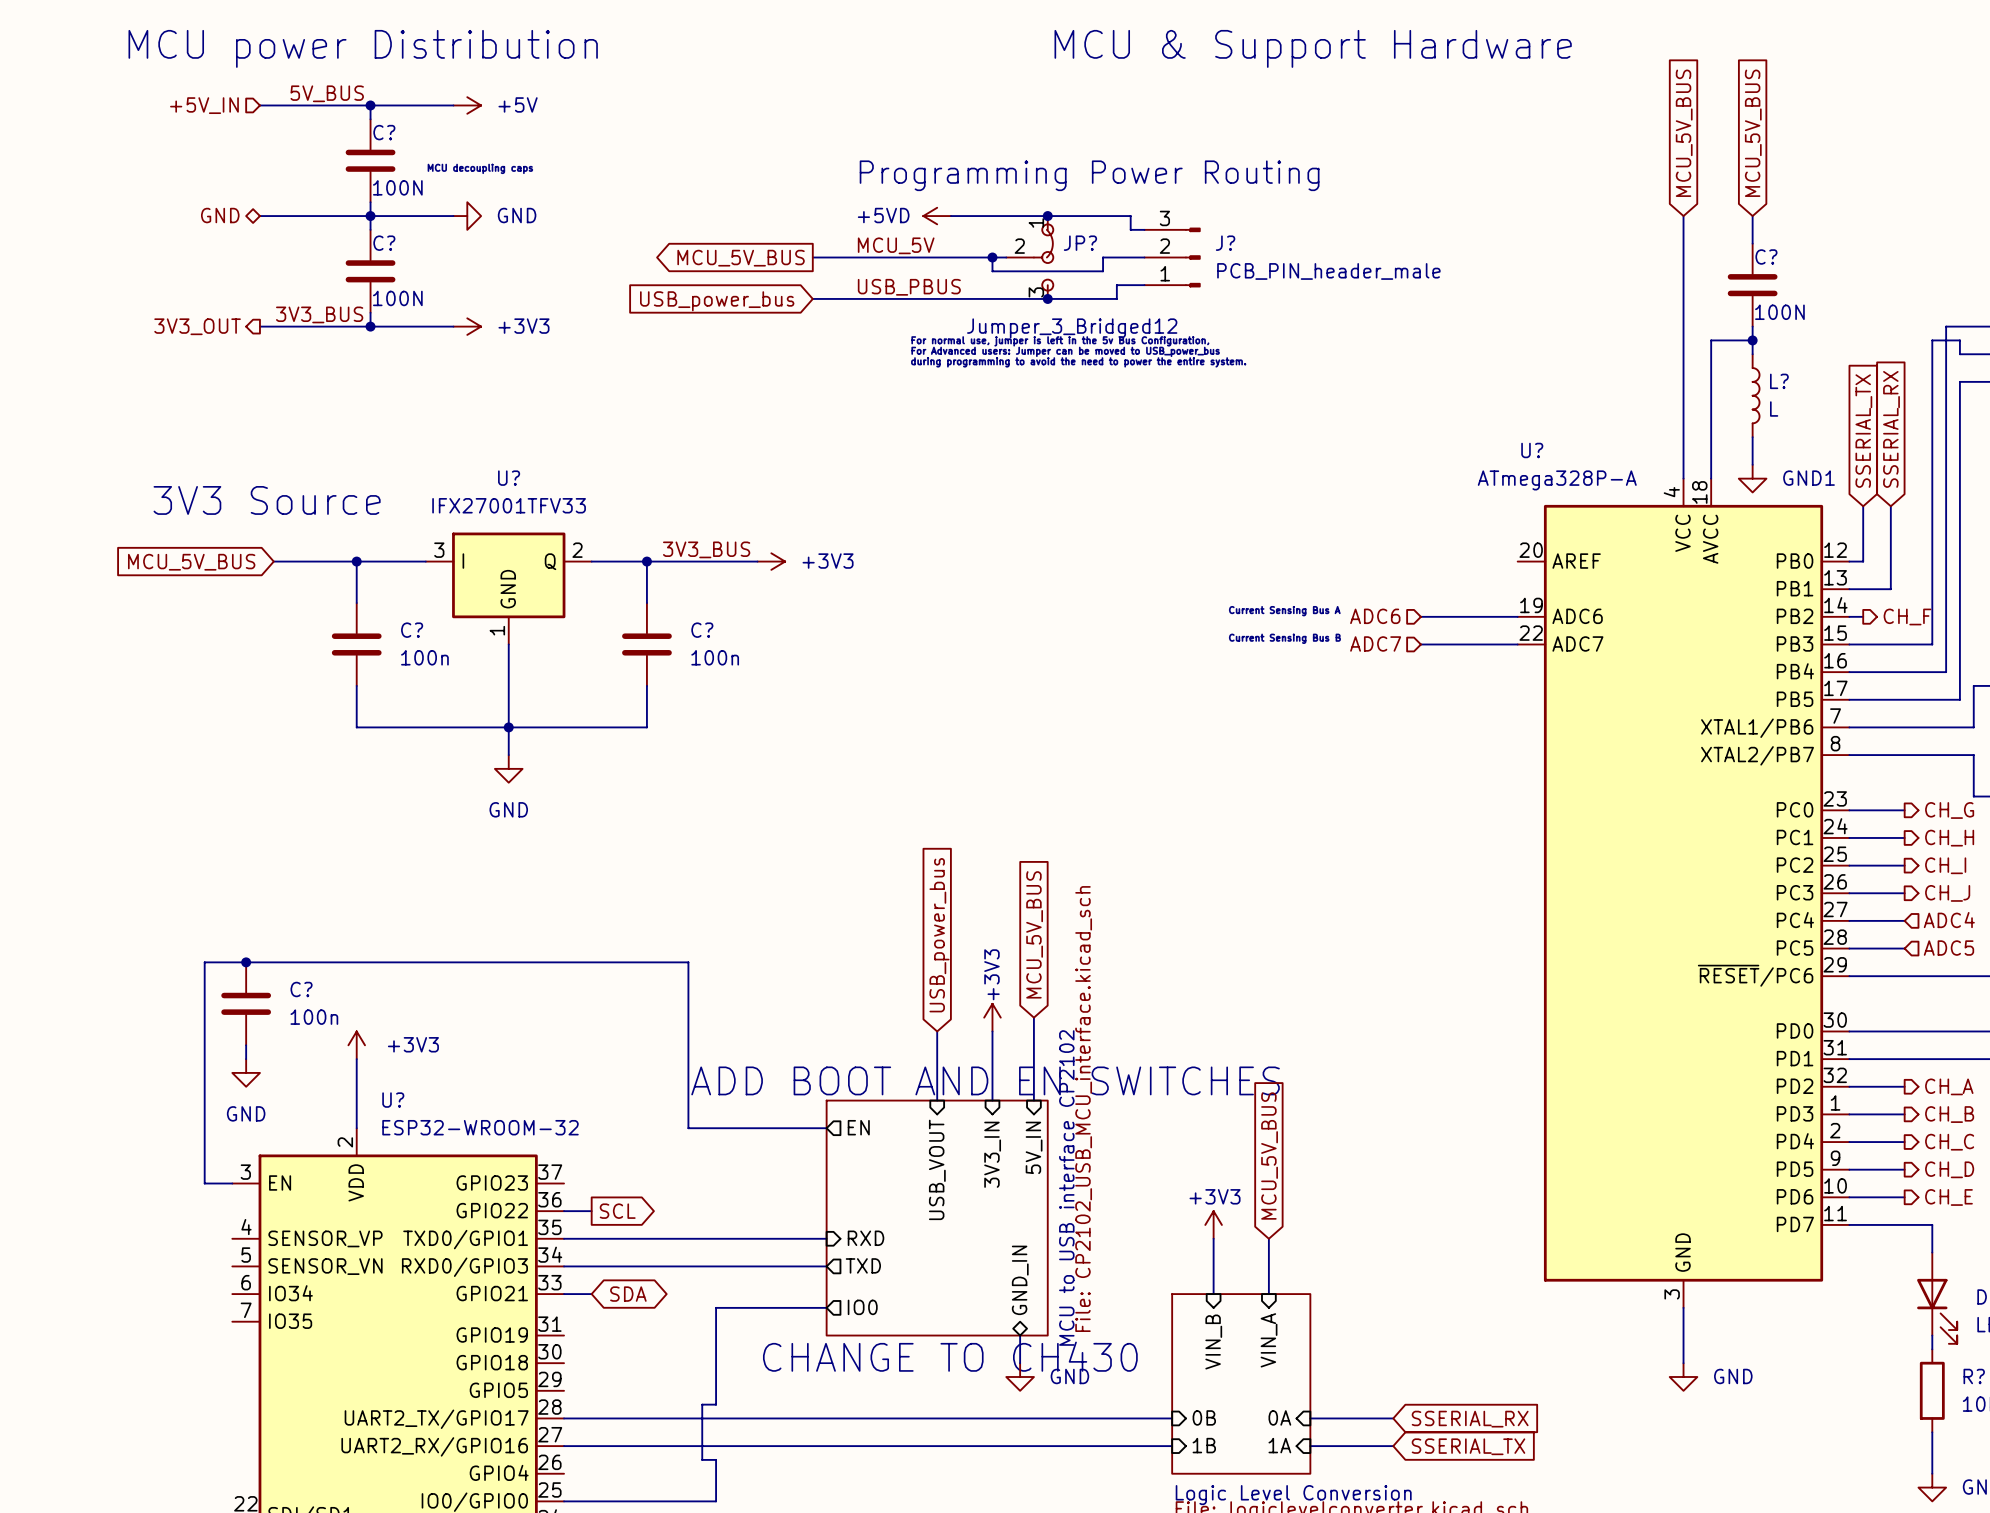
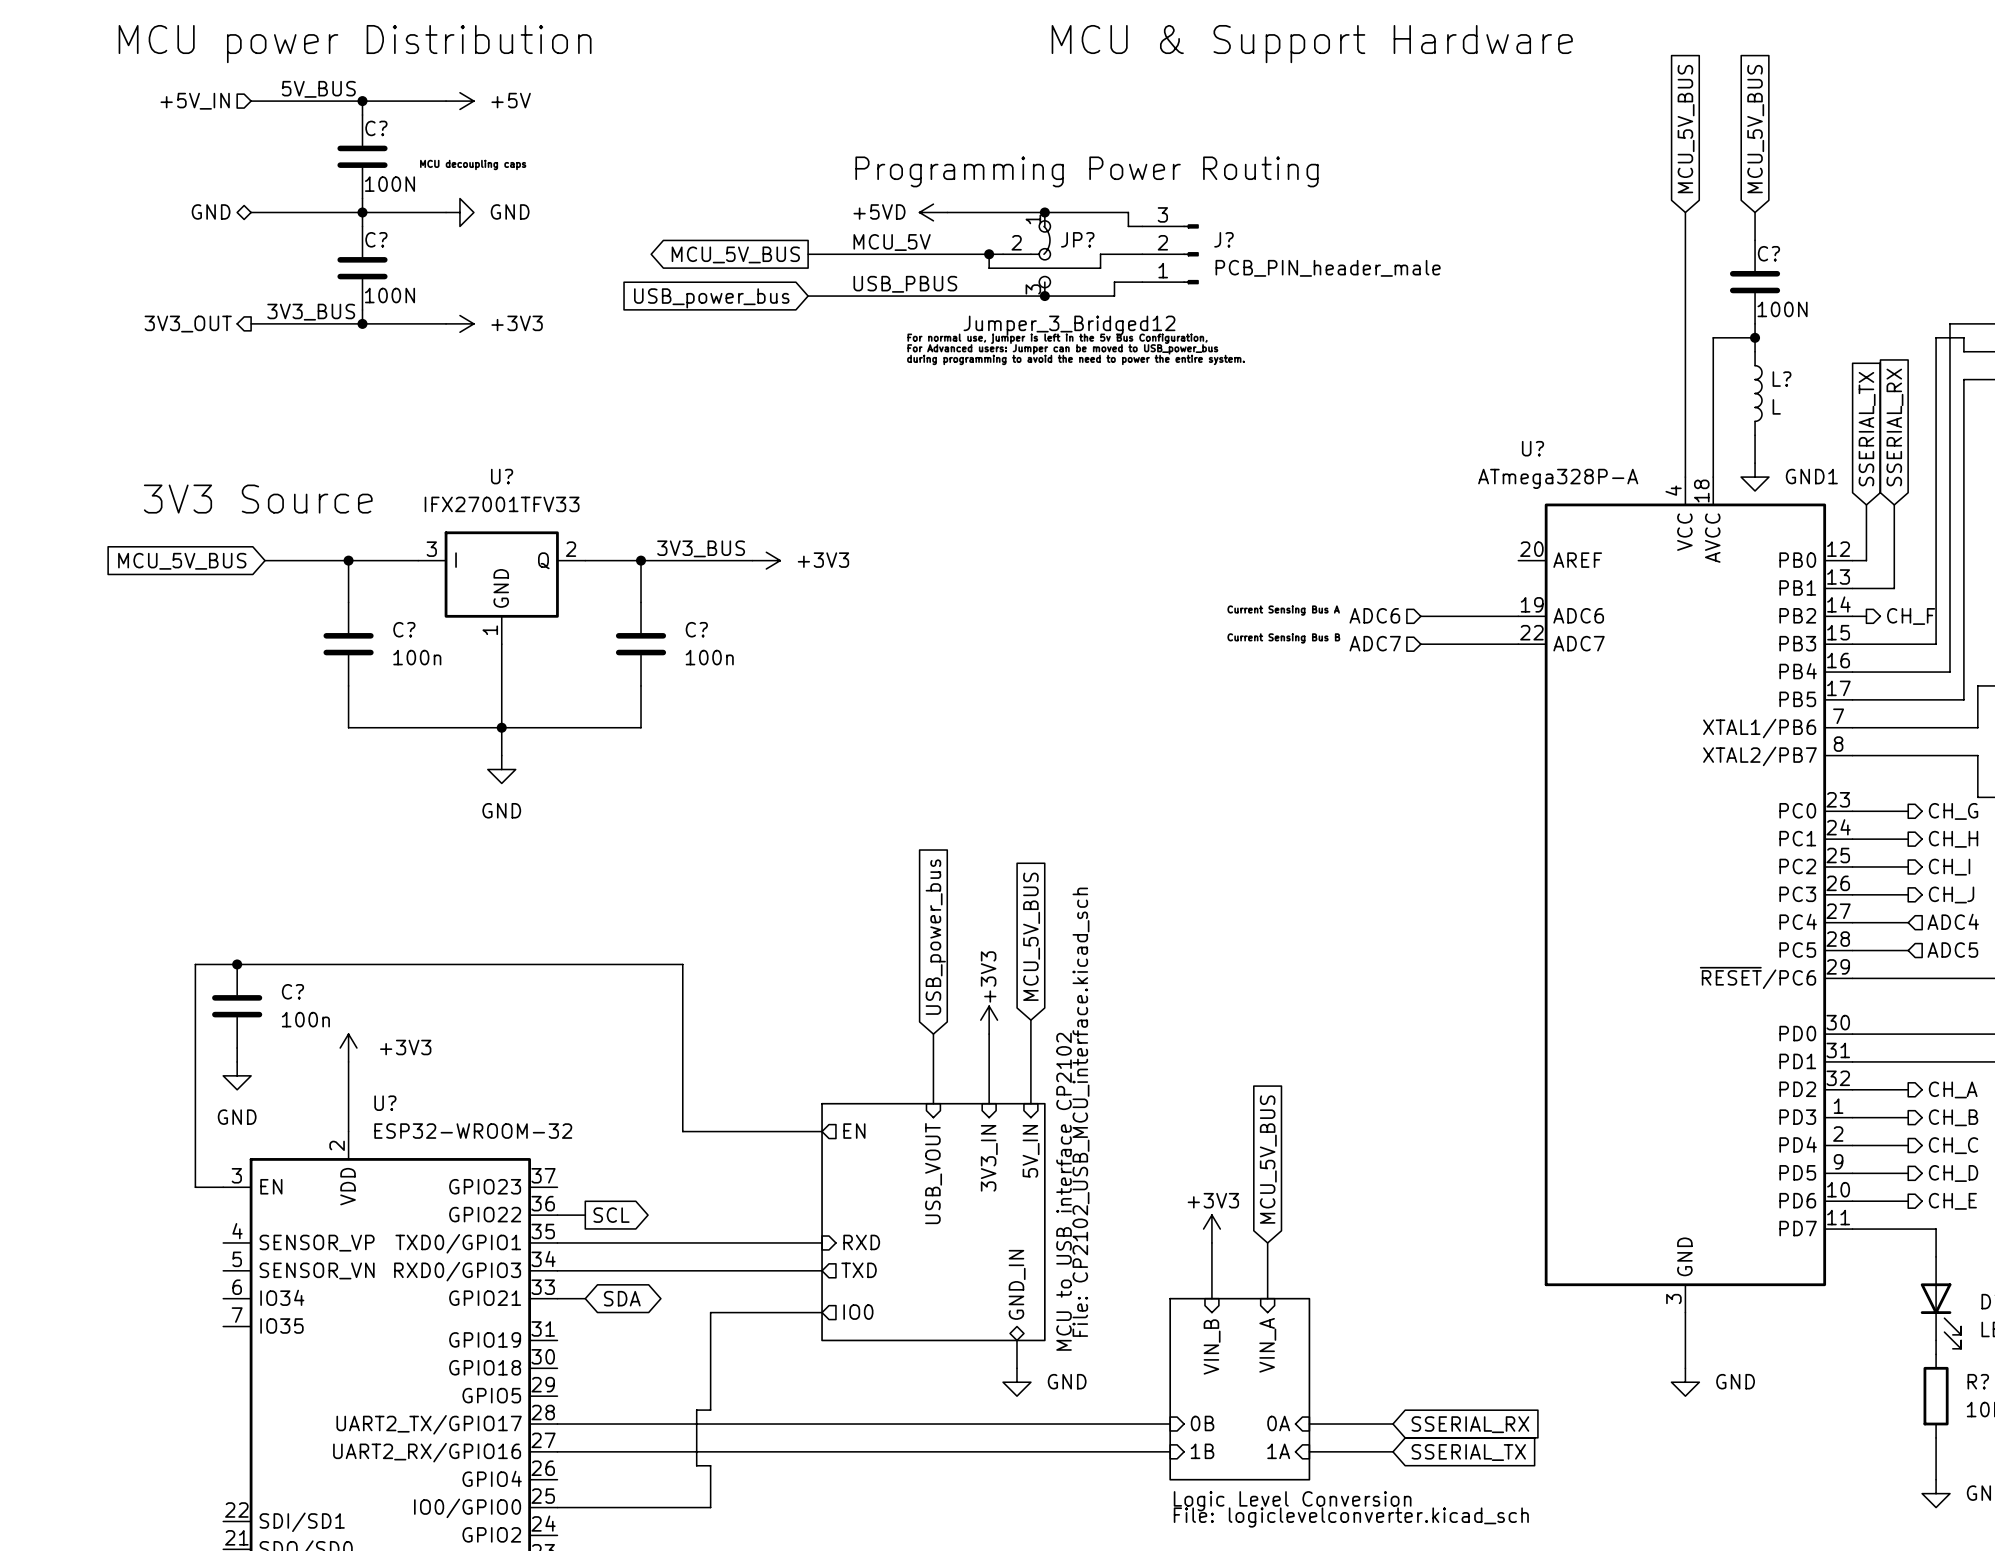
text: ADD BOOT AND EN SWITCHES (985, 1080) -> none
text: CHANGE TO CH430 (950, 1356) -> none

